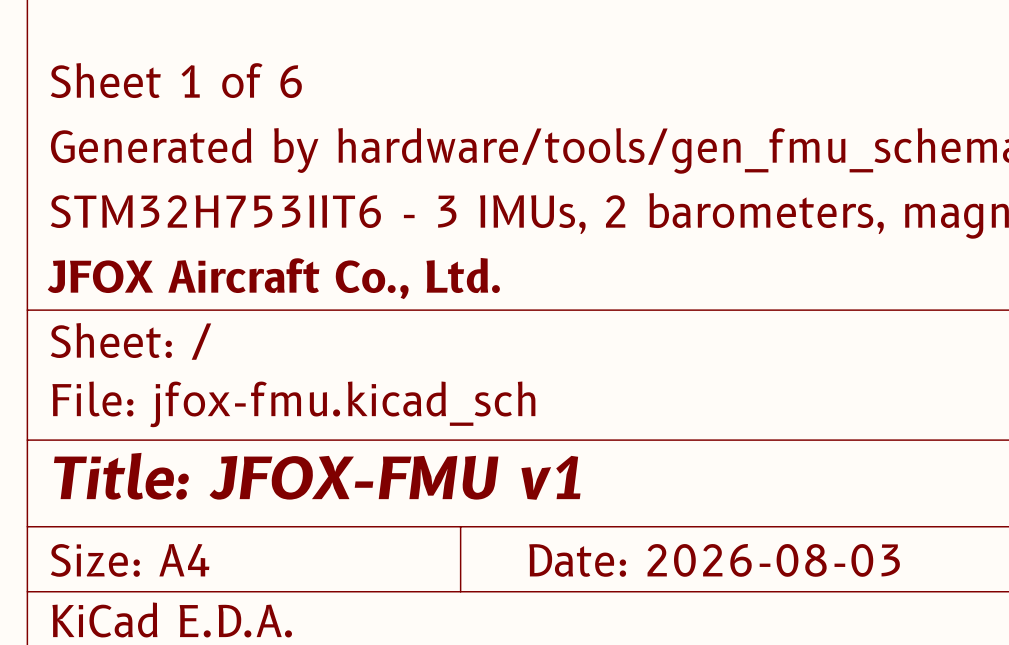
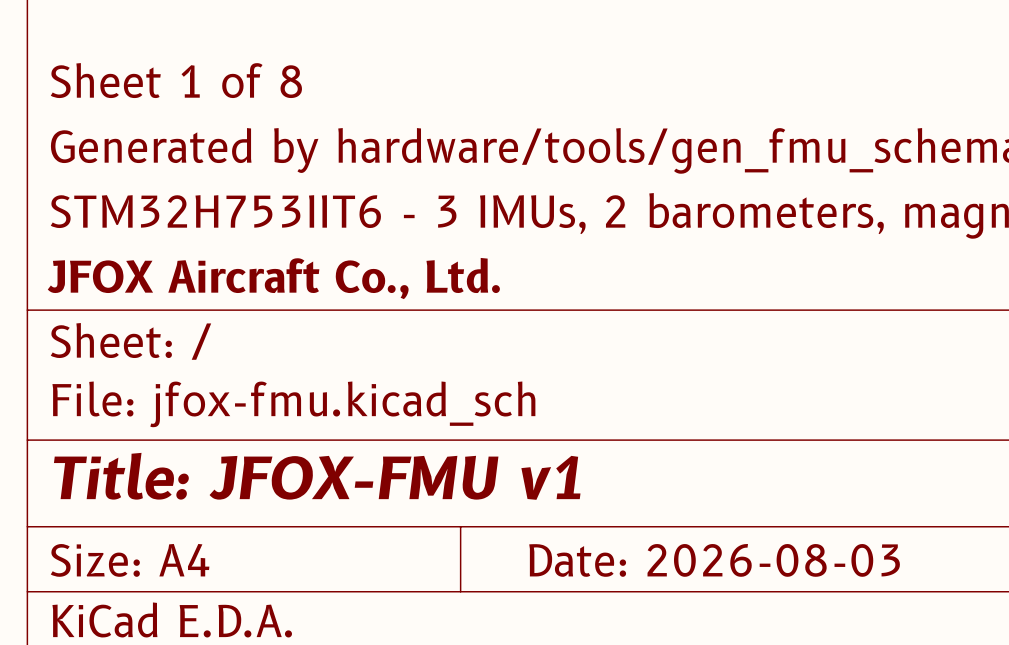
title block: Sheet 1 of 6 (176, 80) -> Sheet 1 of 8 (176, 80)

